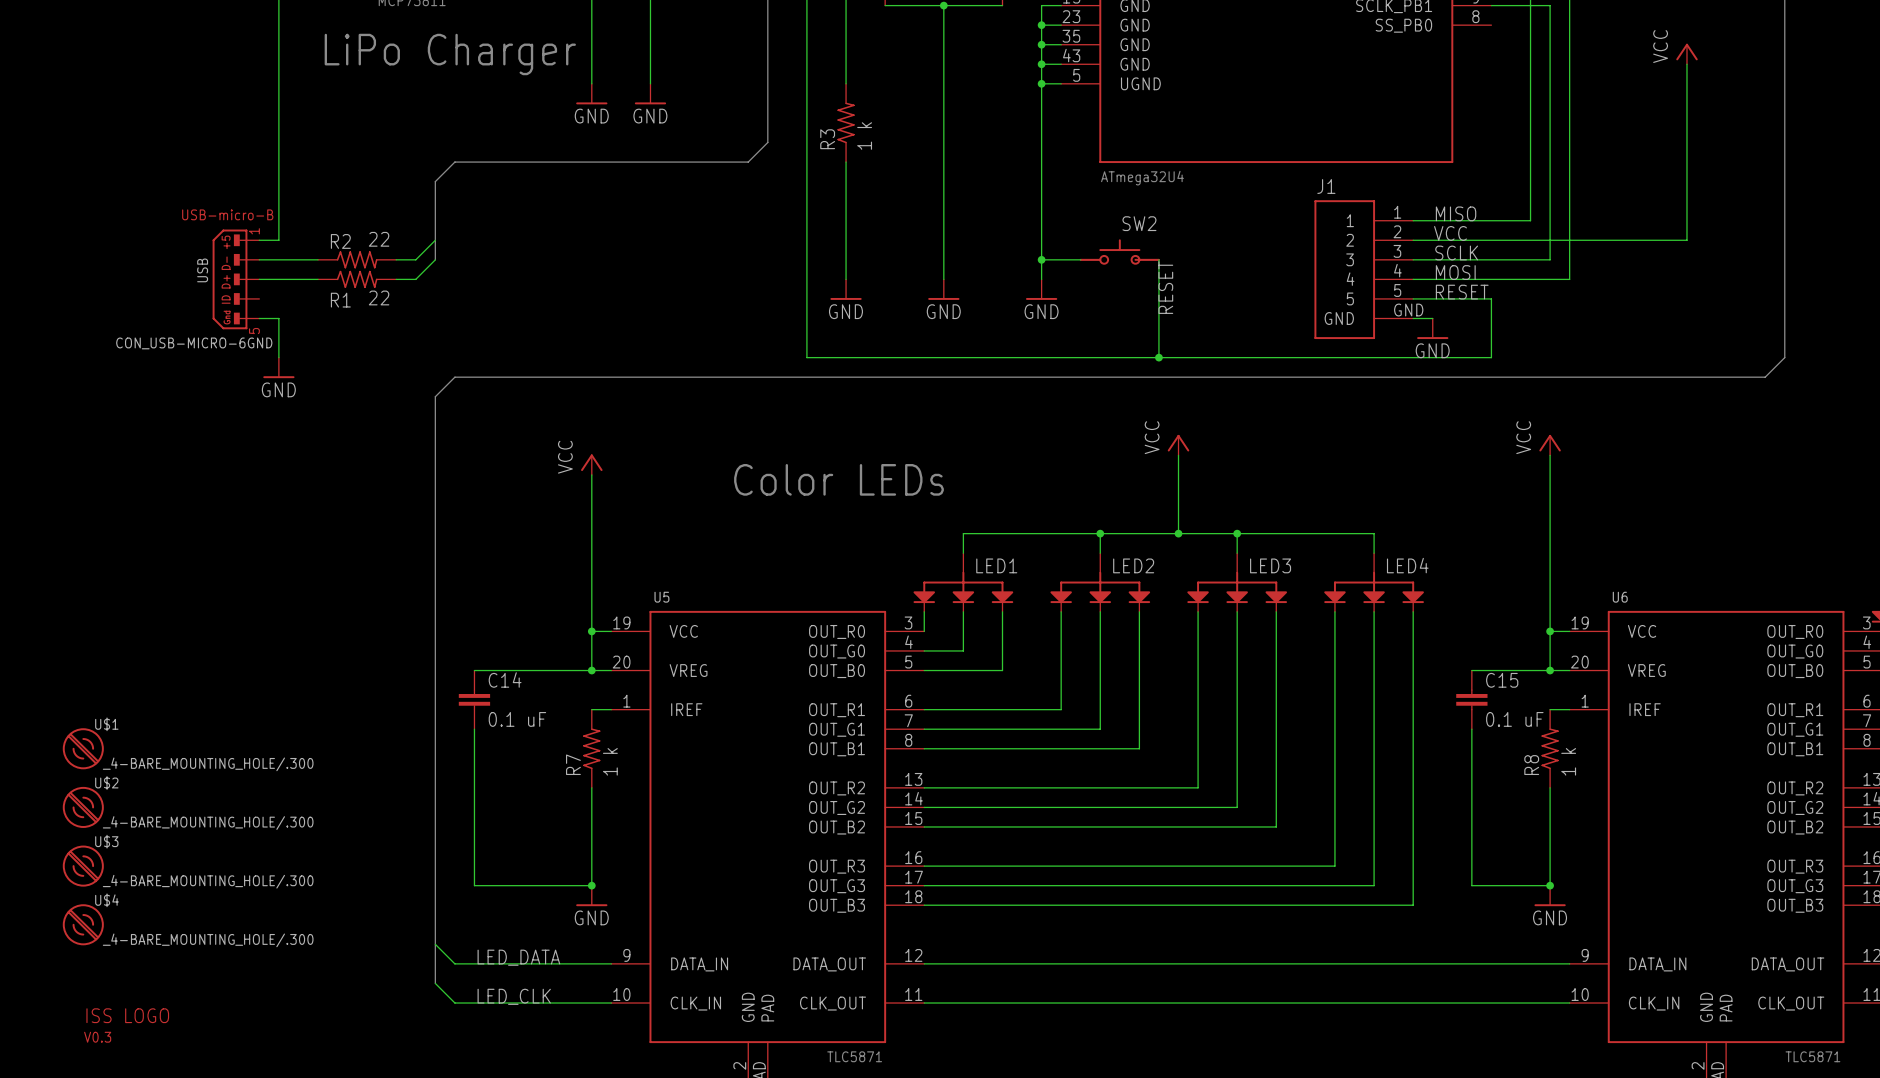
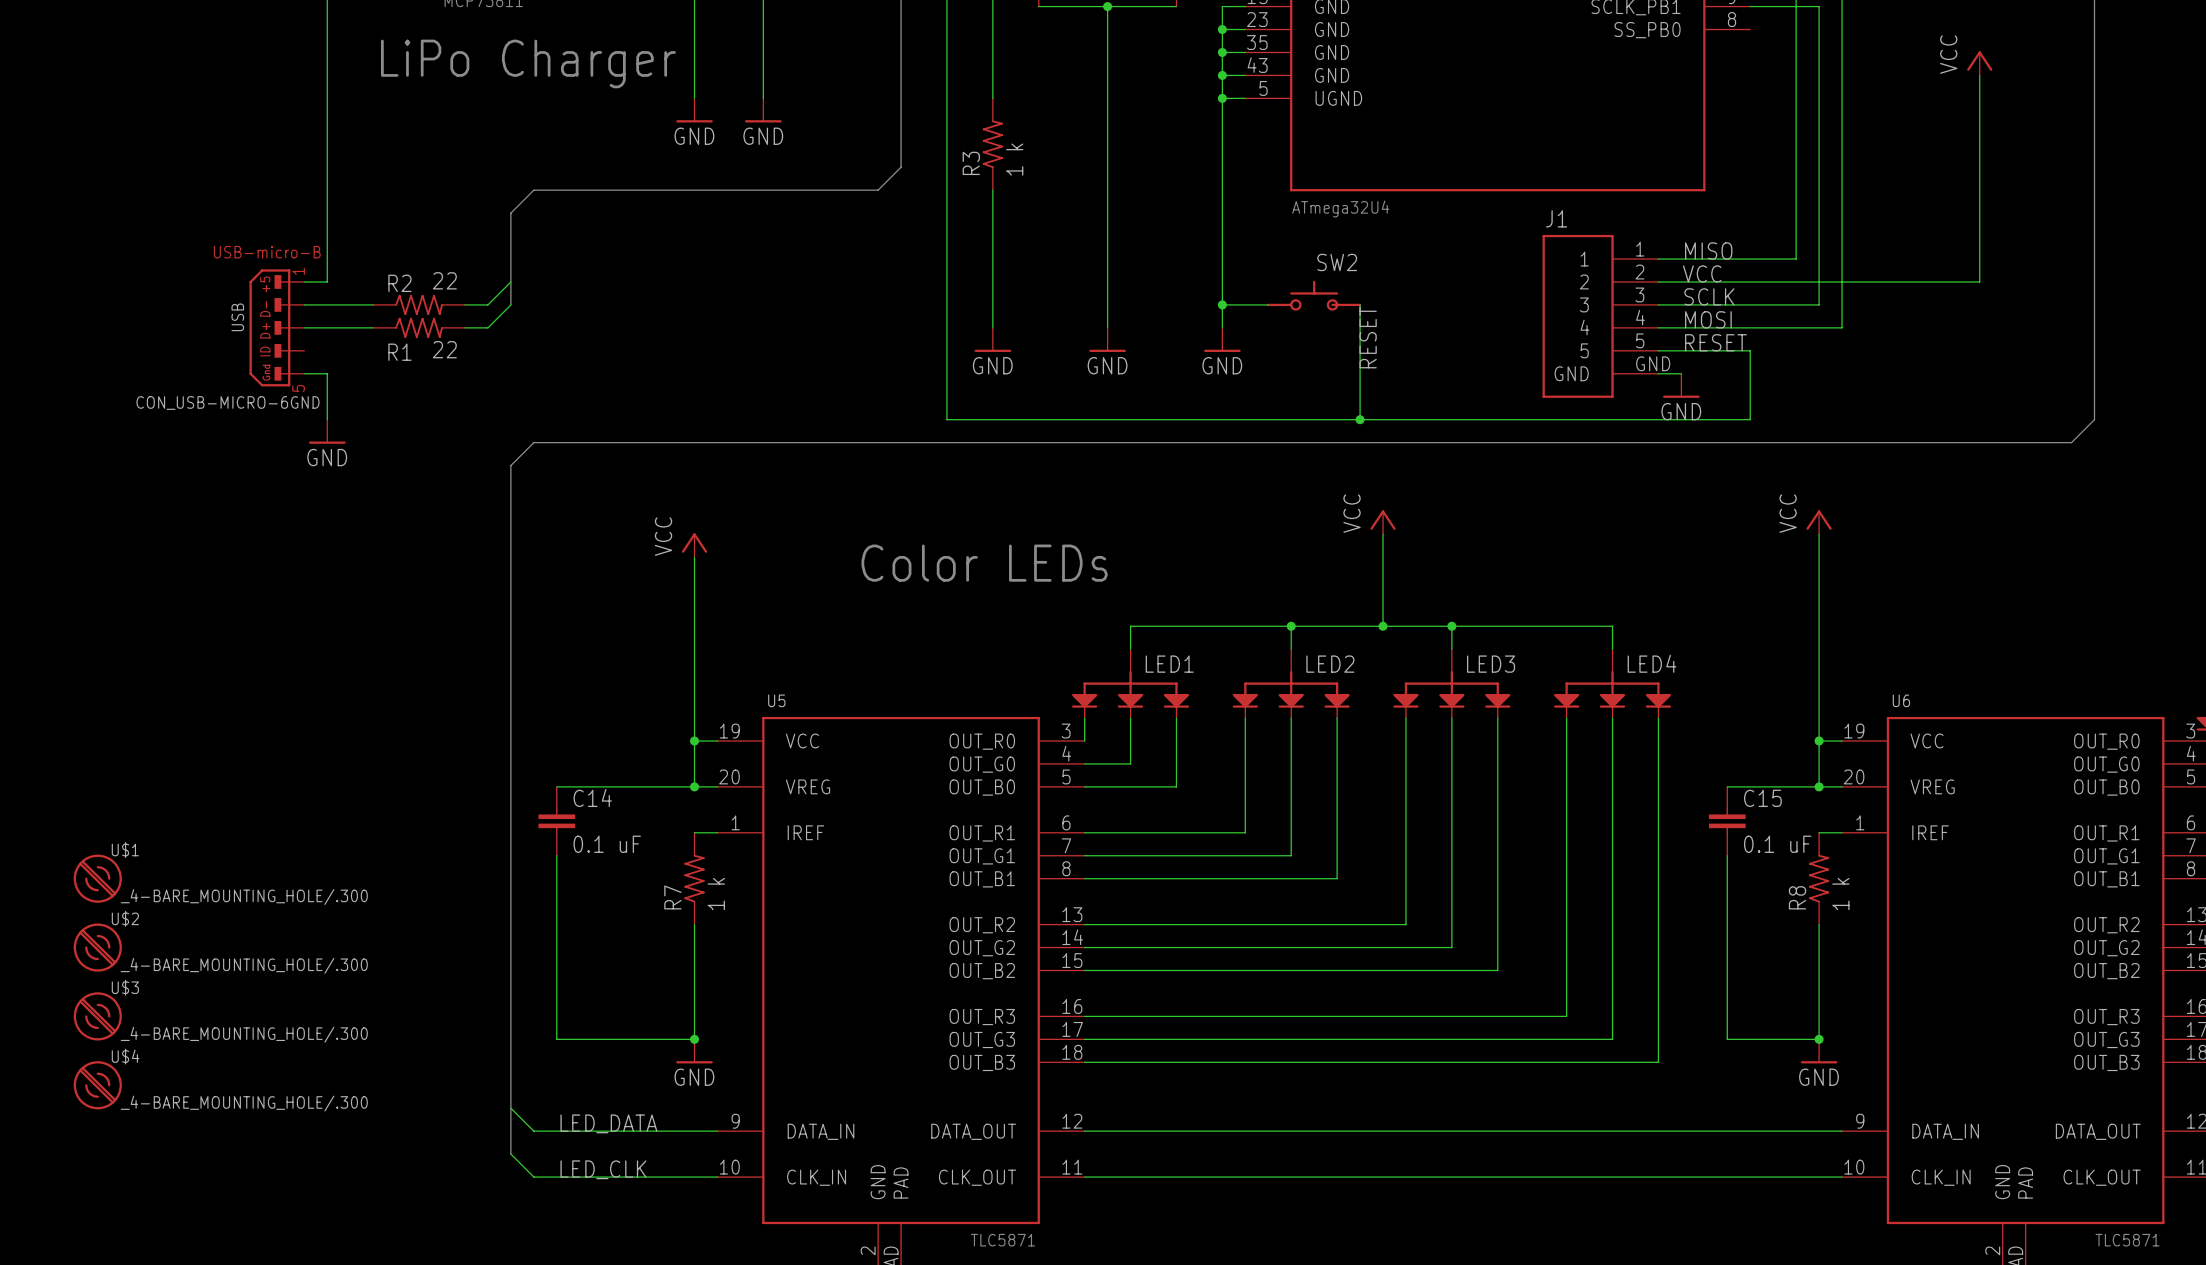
part: V0.3 (126, 1025) -> none

